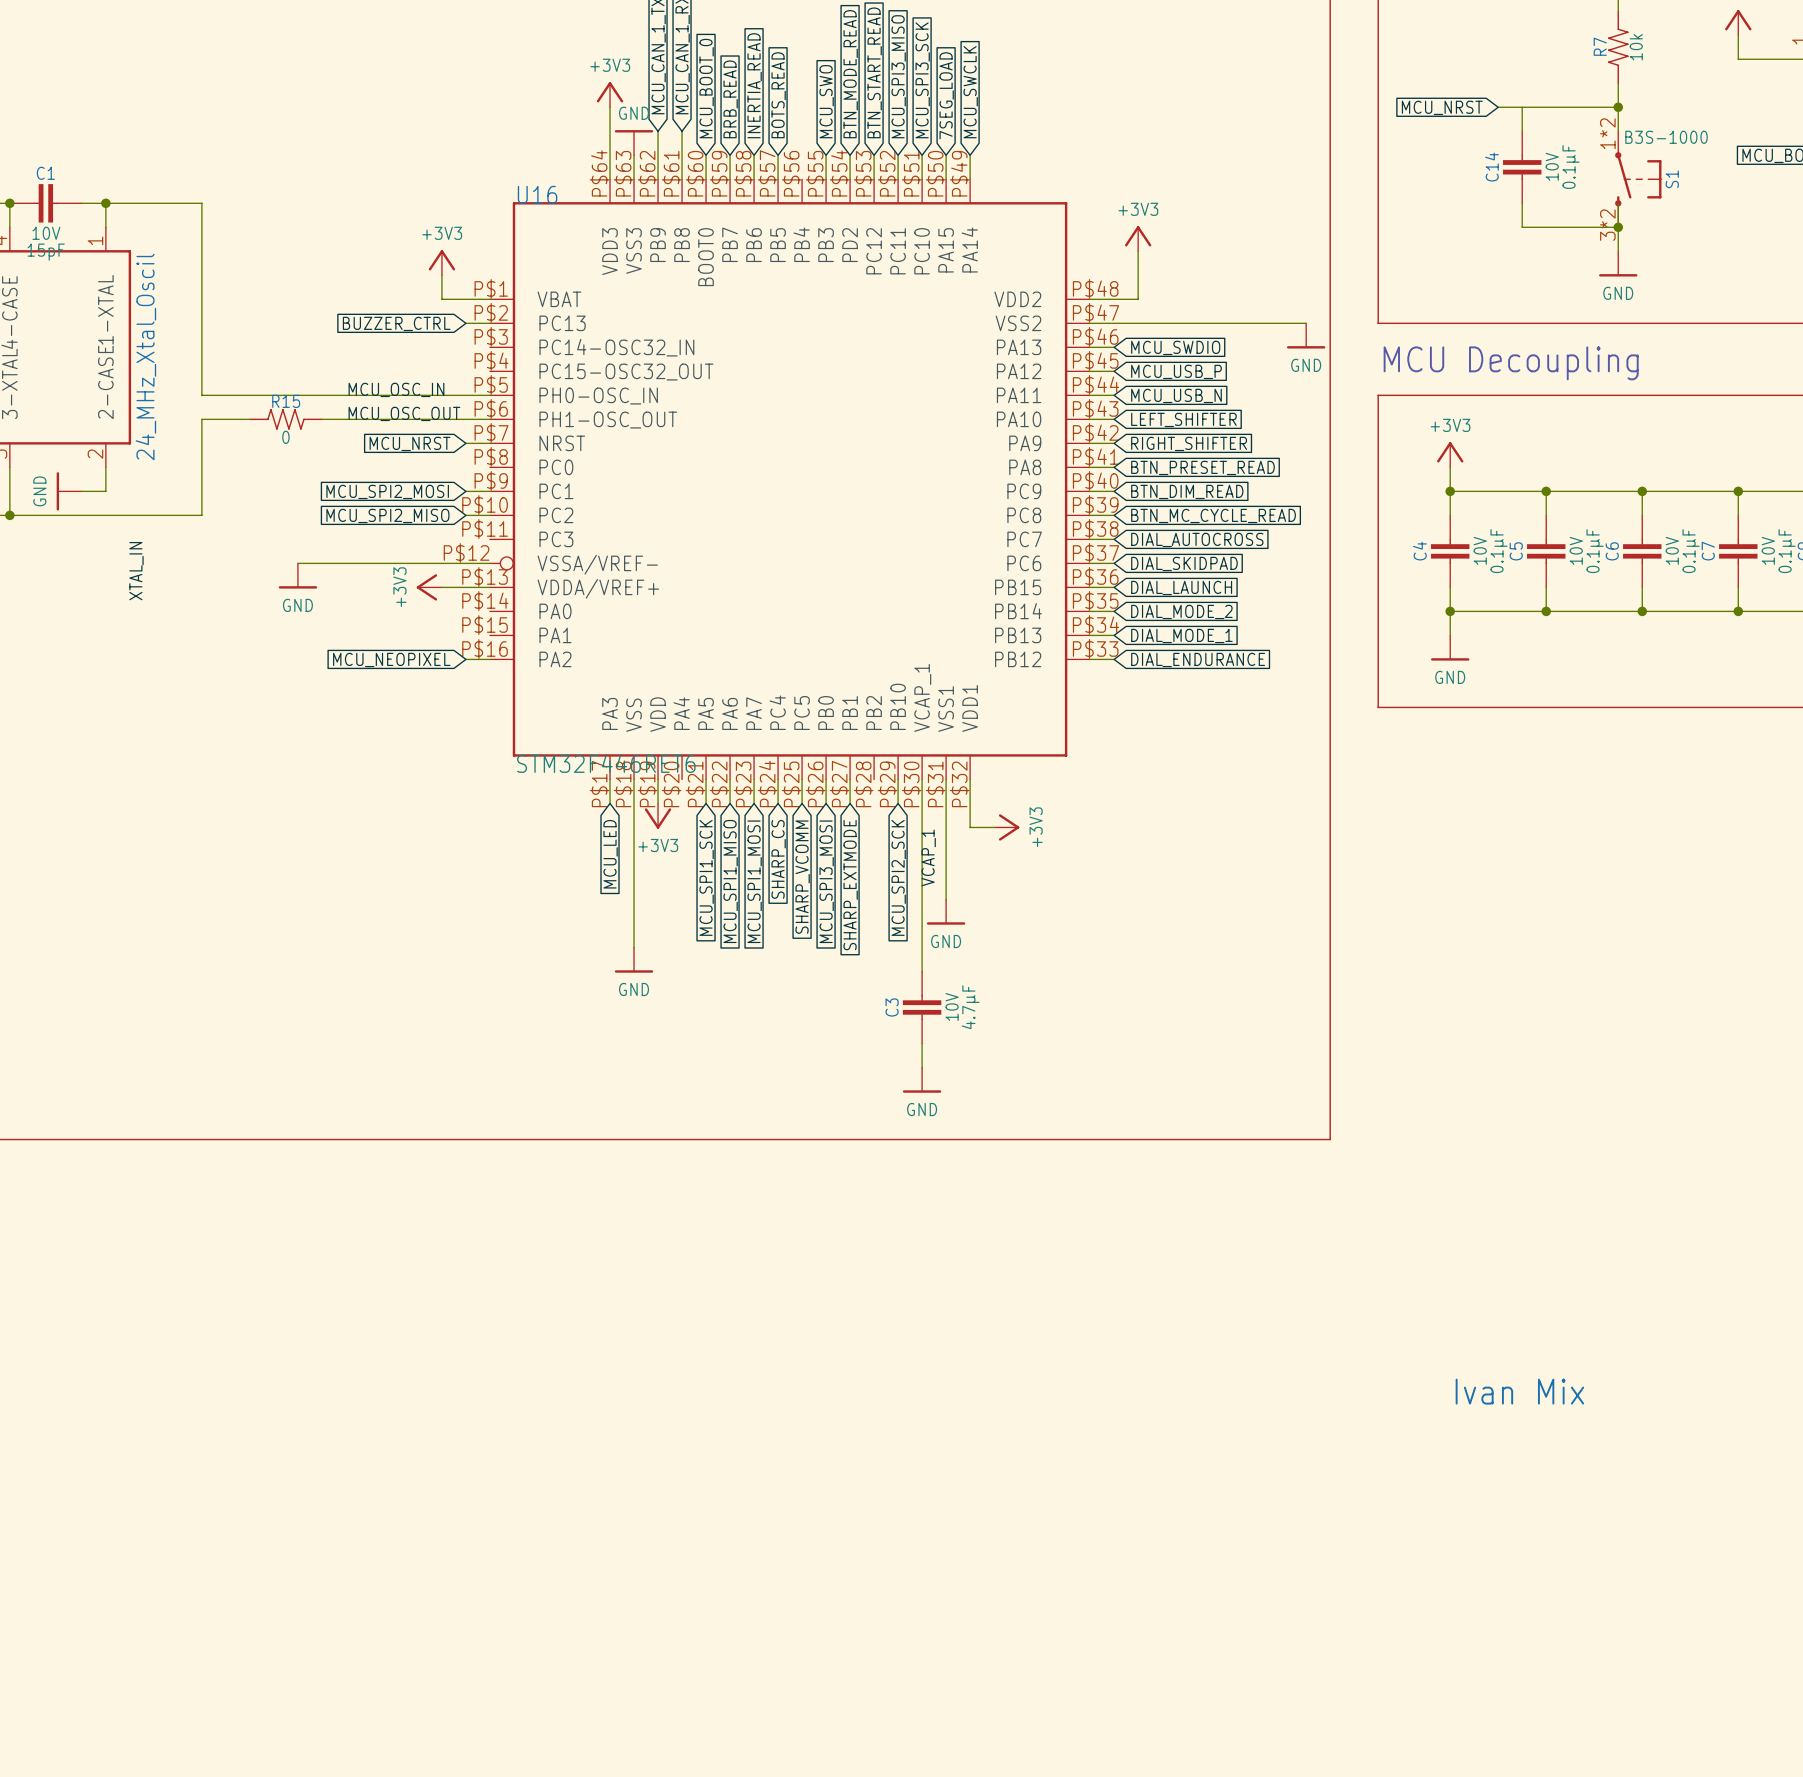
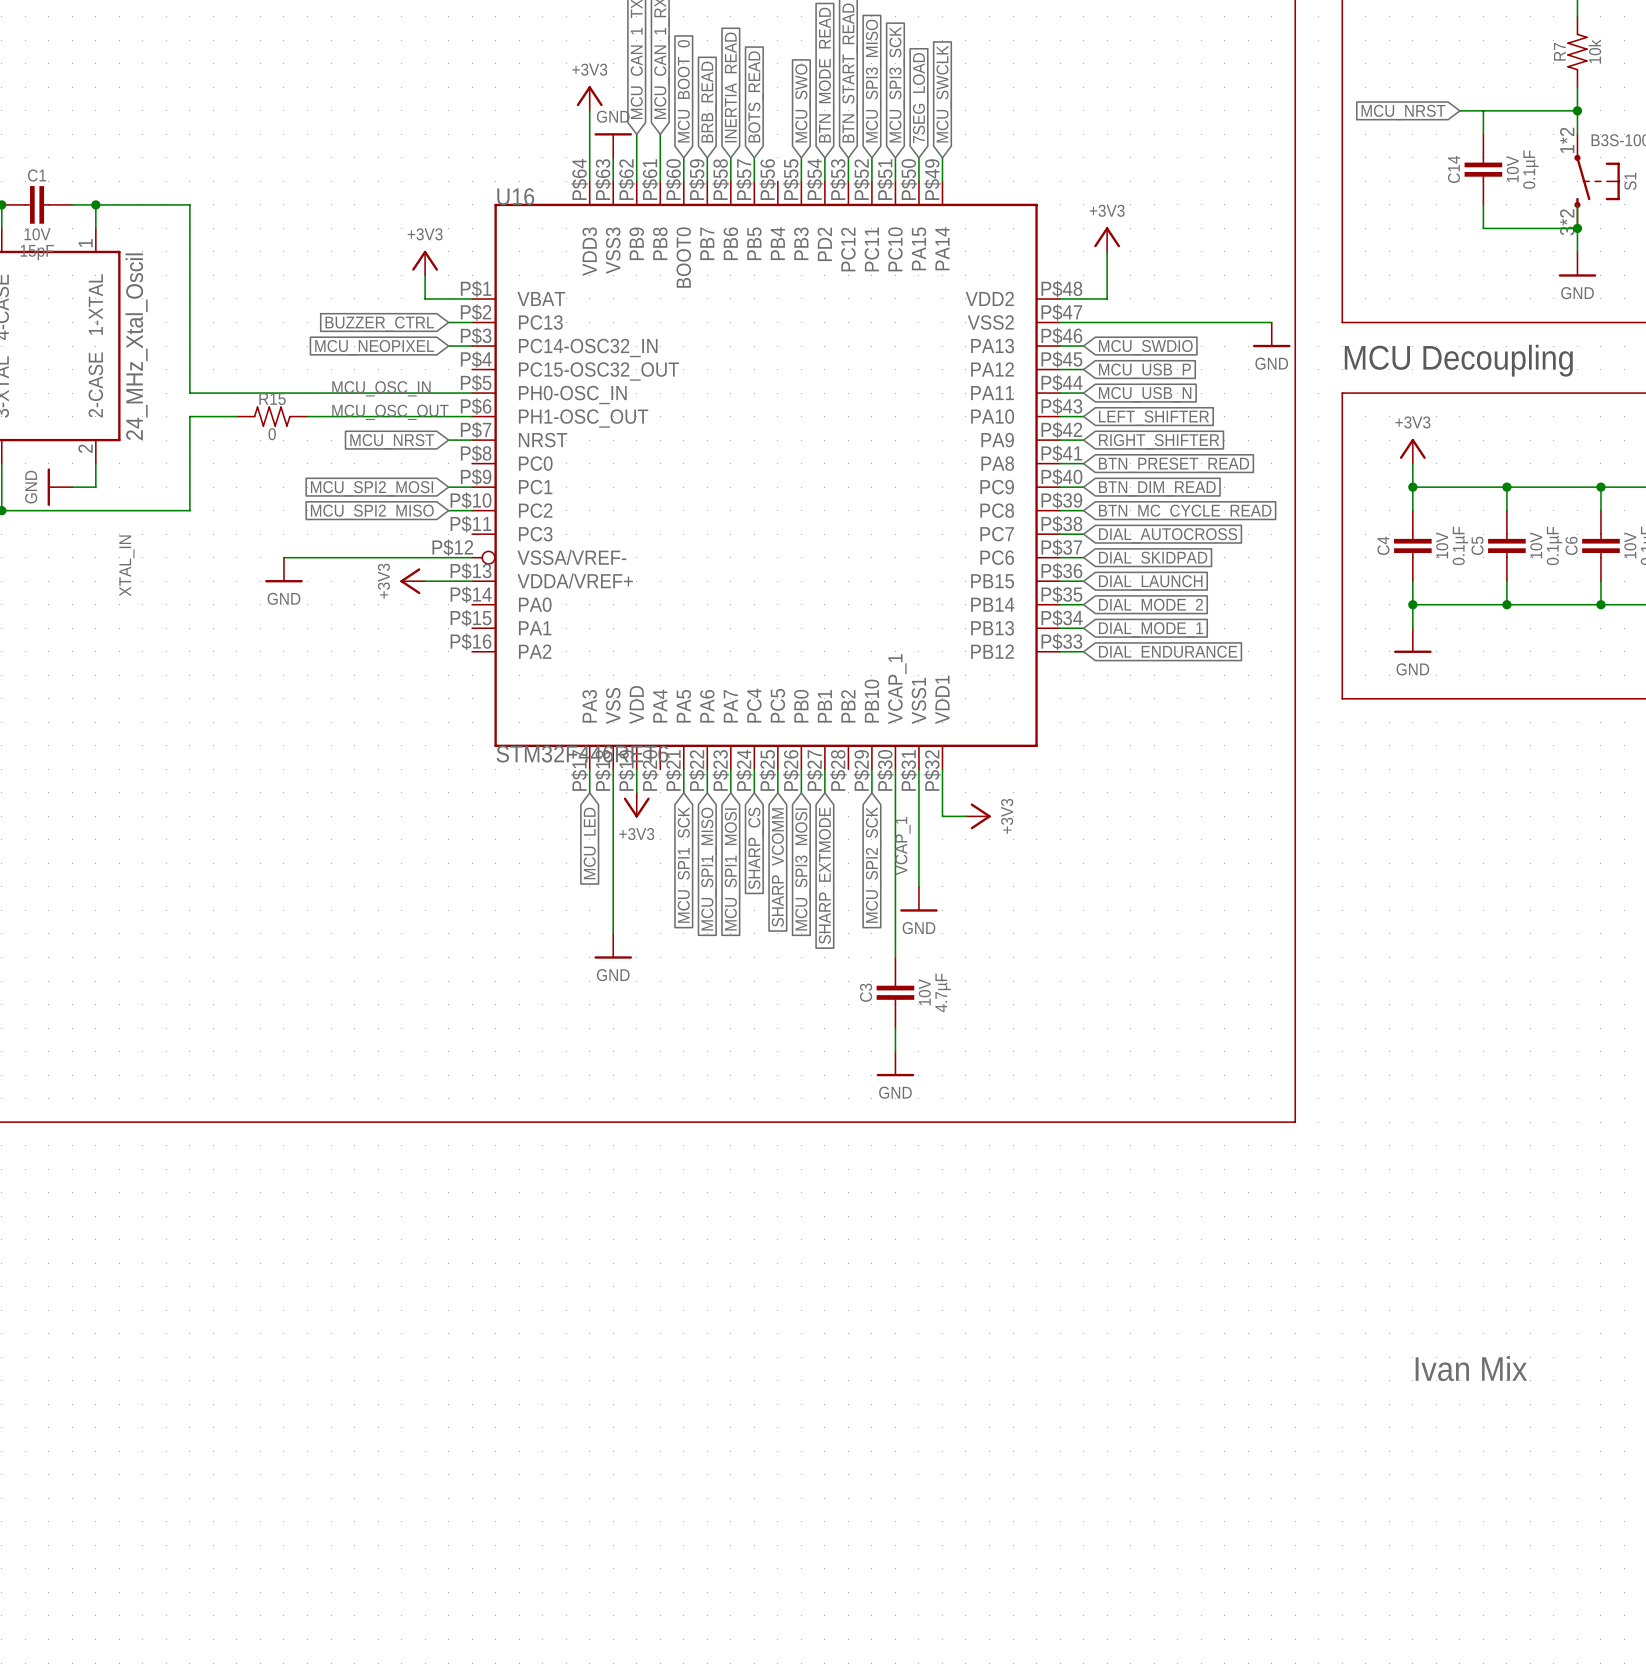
global label: none -> MCU_NEOPIXEL (374, 347)
wire: none -> (448, 346) (472, 346)
global label: MCU_NEOPIXEL (391, 659) -> none
wire: (465, 659) (489, 659) -> none

